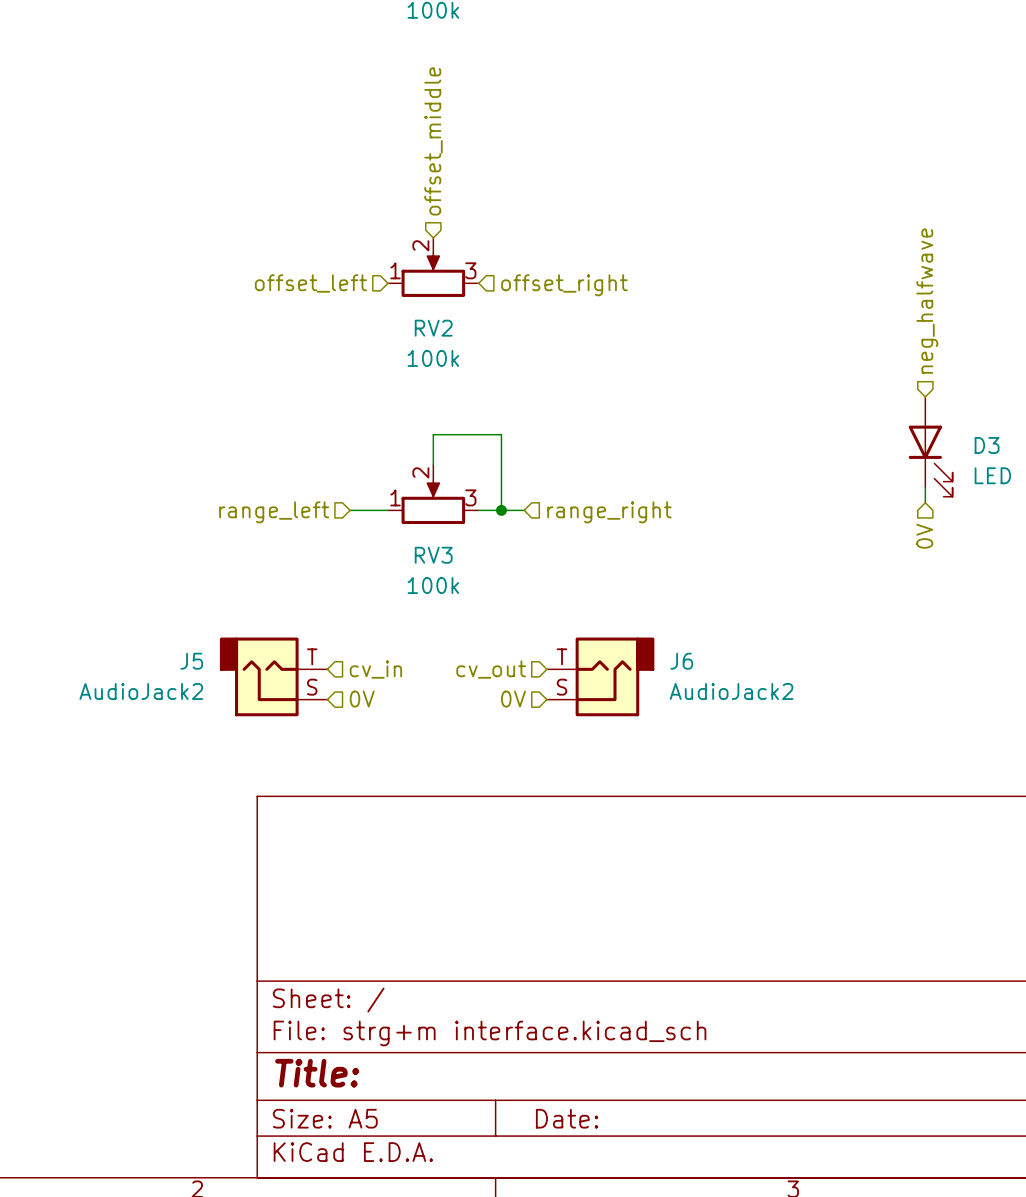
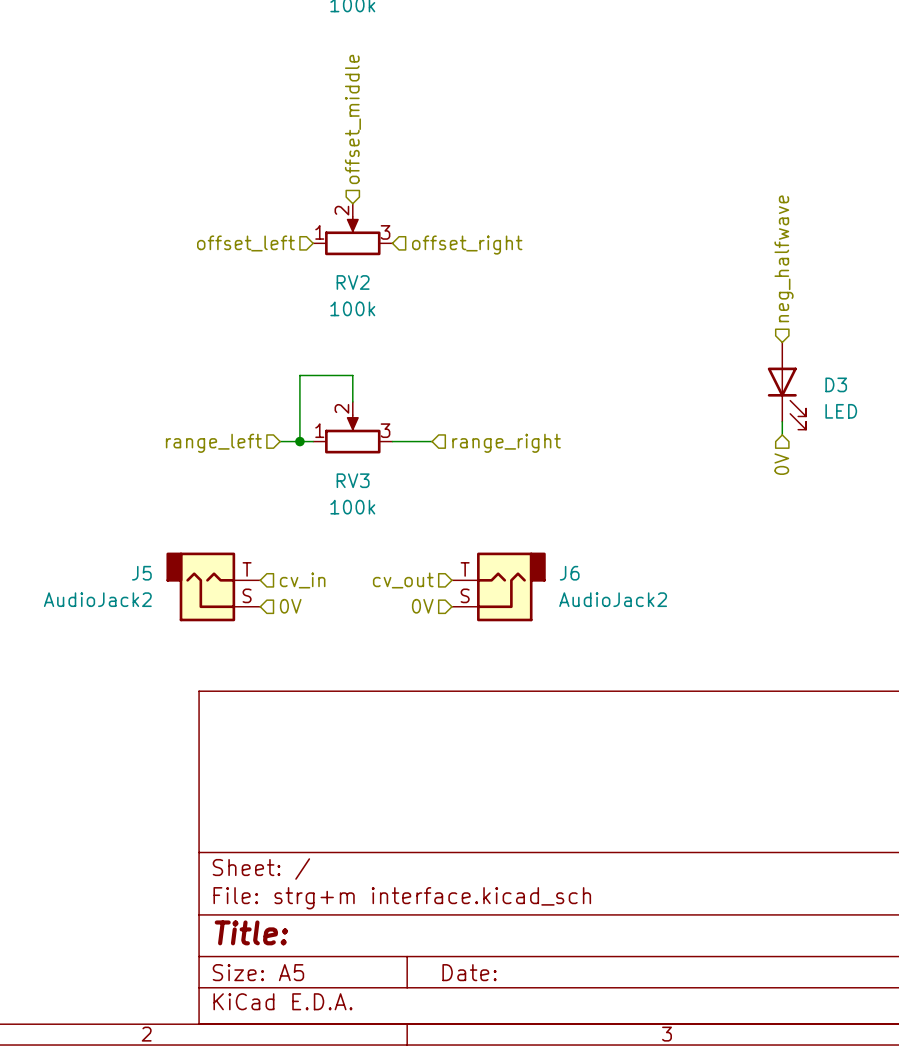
wire: (433, 434) (501, 434) (501, 510) -> (352, 375) (299, 375) (299, 441)
junction: none -> (299, 441)
junction: (501, 510) -> none

